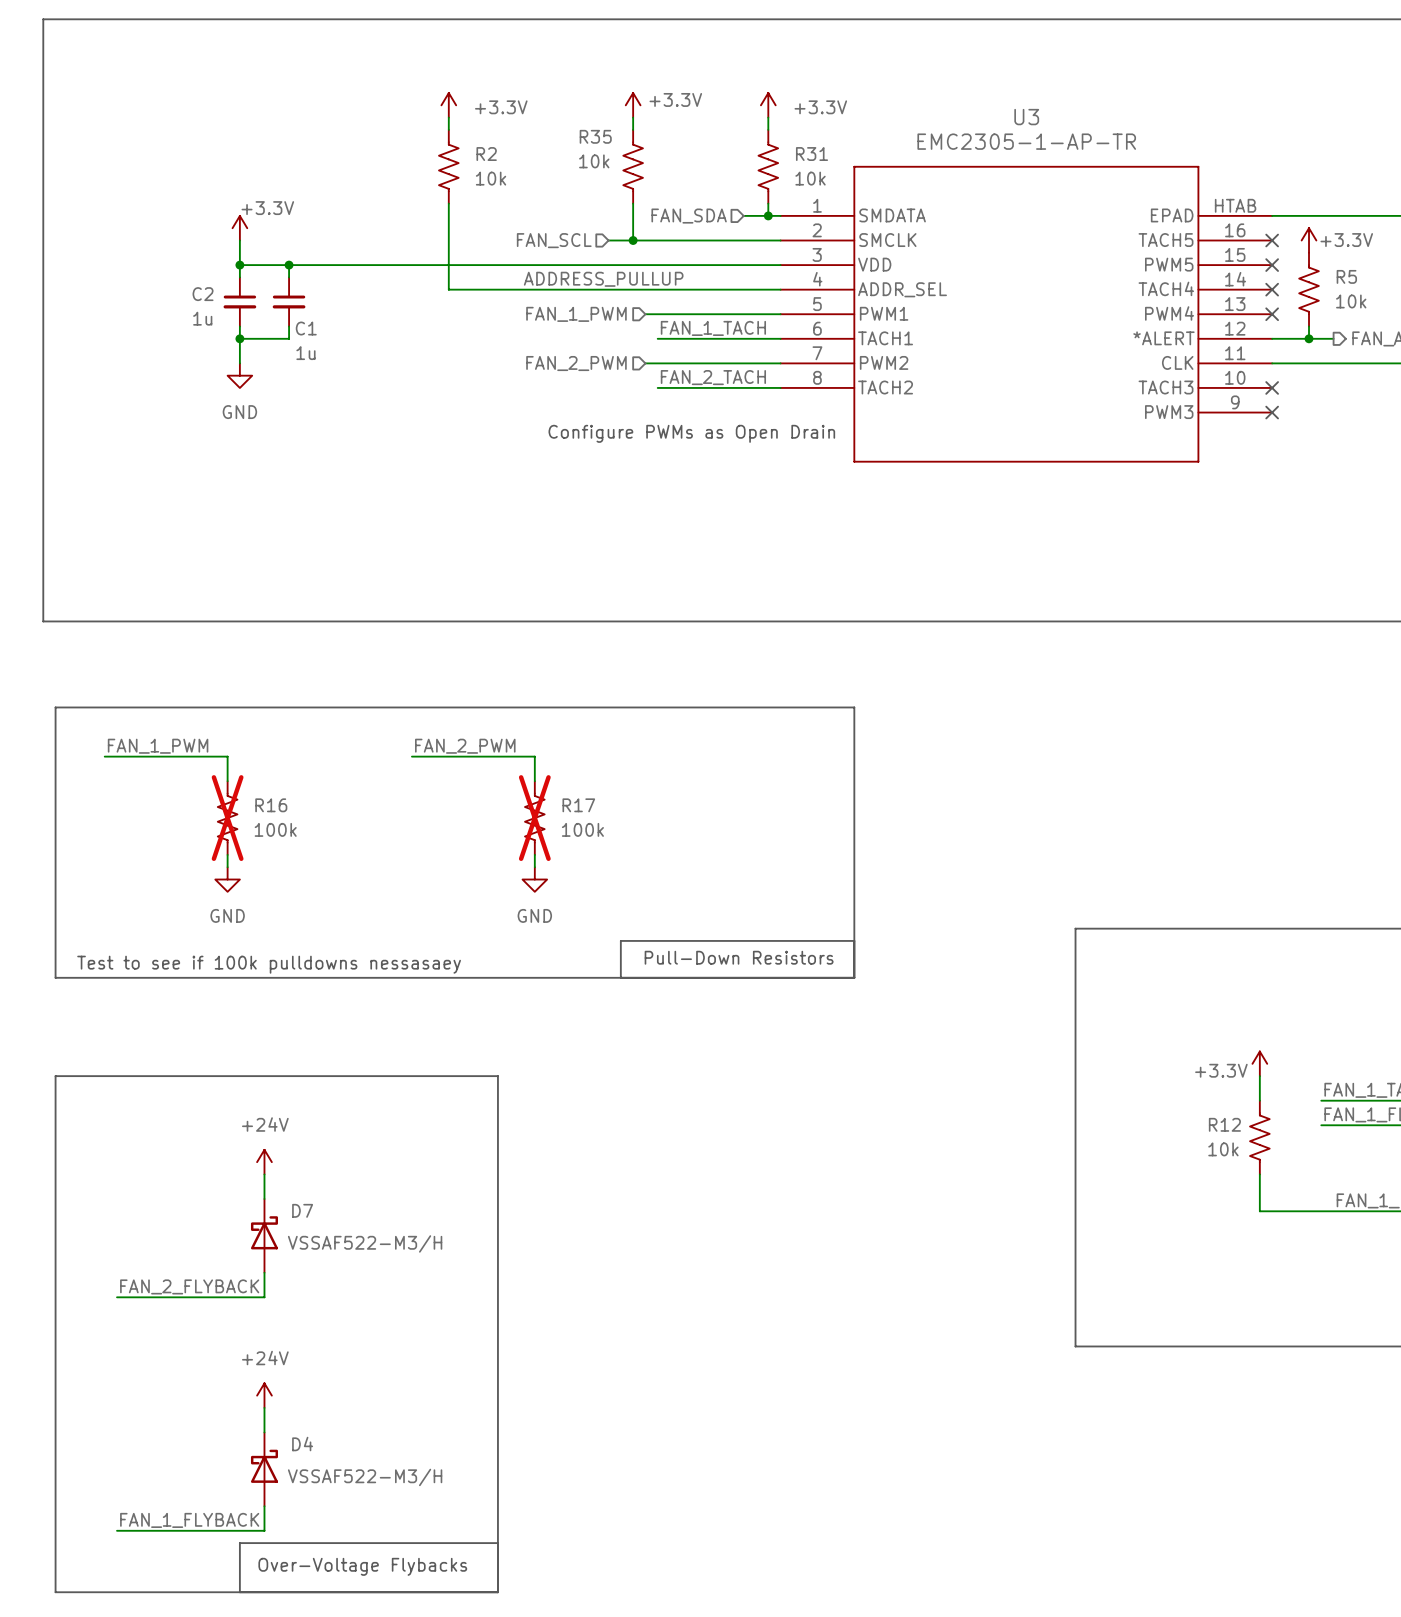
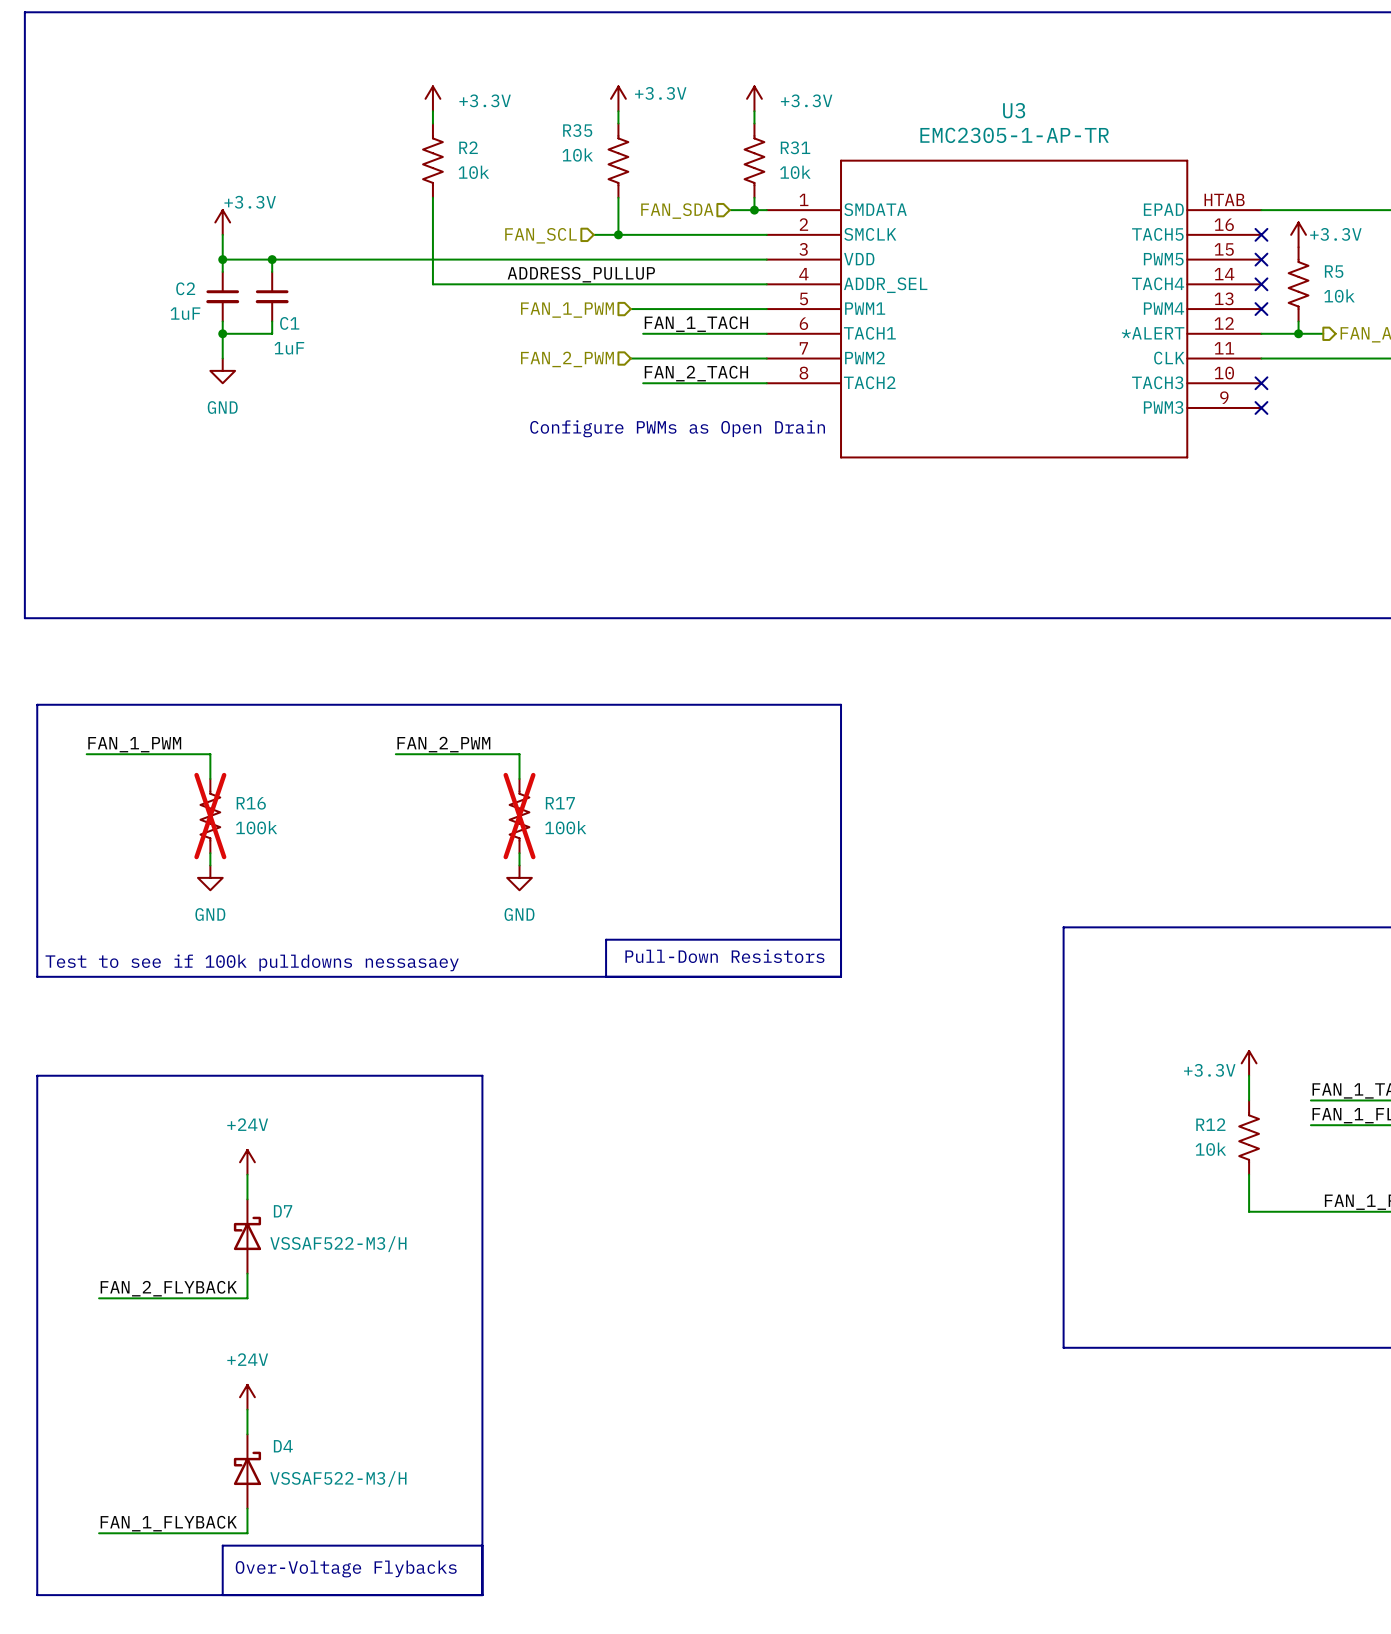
C2 value: 1u (202, 318) -> 1uF (185, 313)
C1 value: 1u (305, 353) -> 1uF (289, 348)

